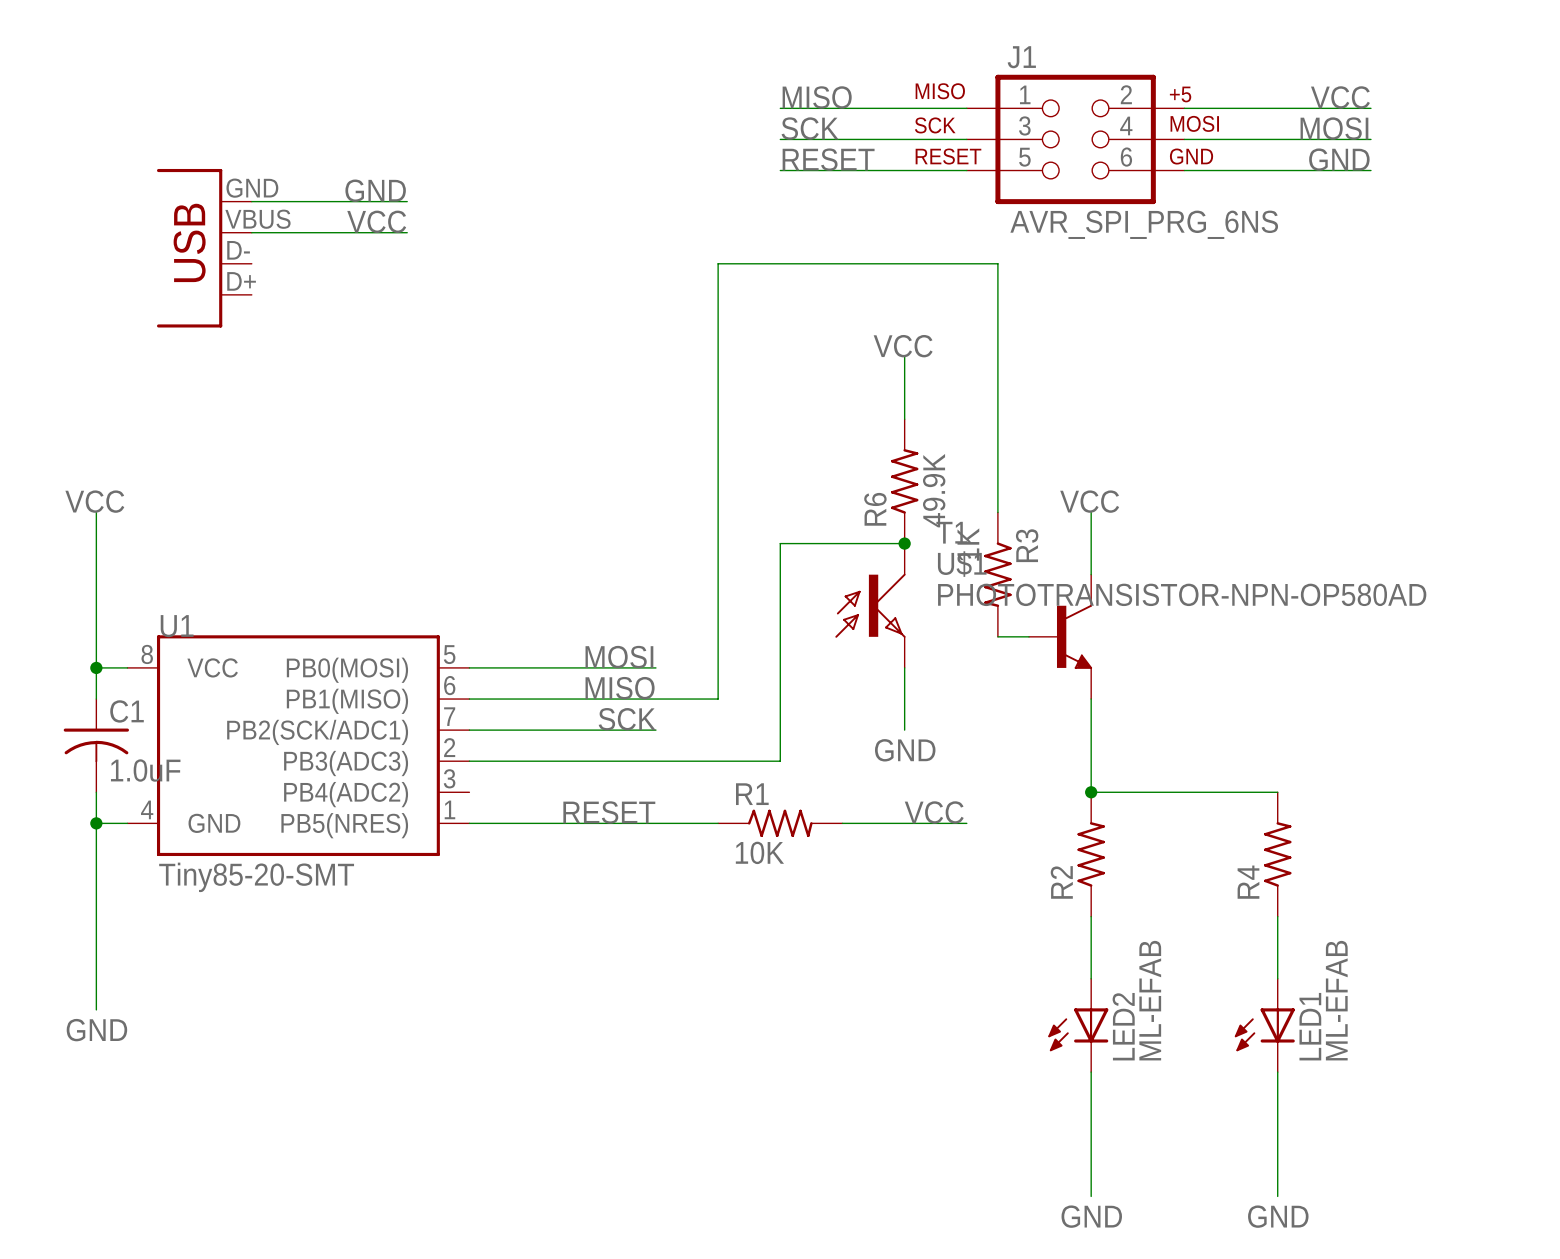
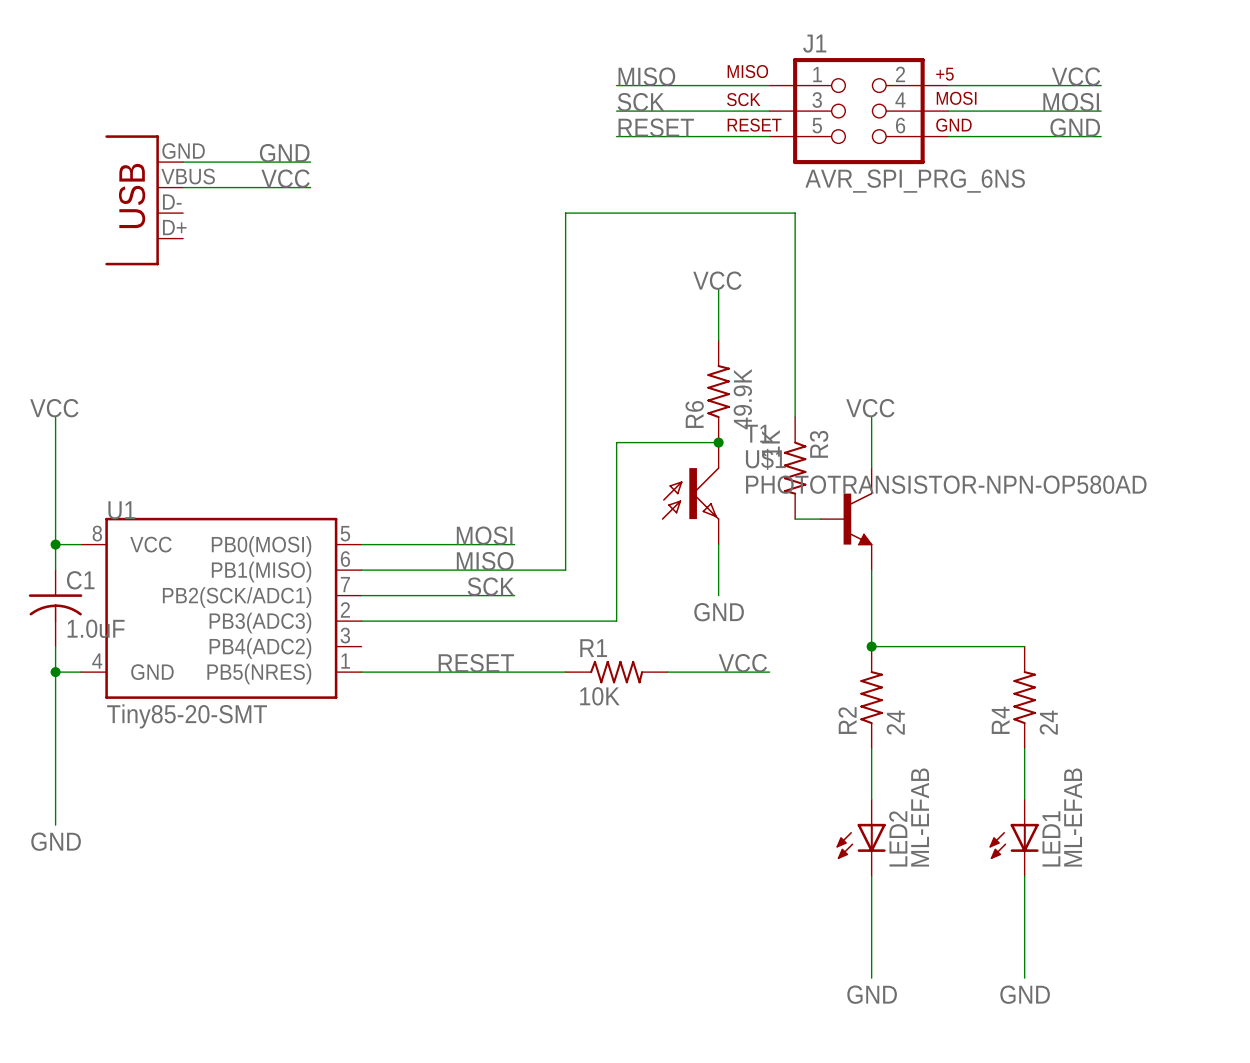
R2 value: none -> 24 (895, 722)
R4 value: none -> 24 (1048, 722)

